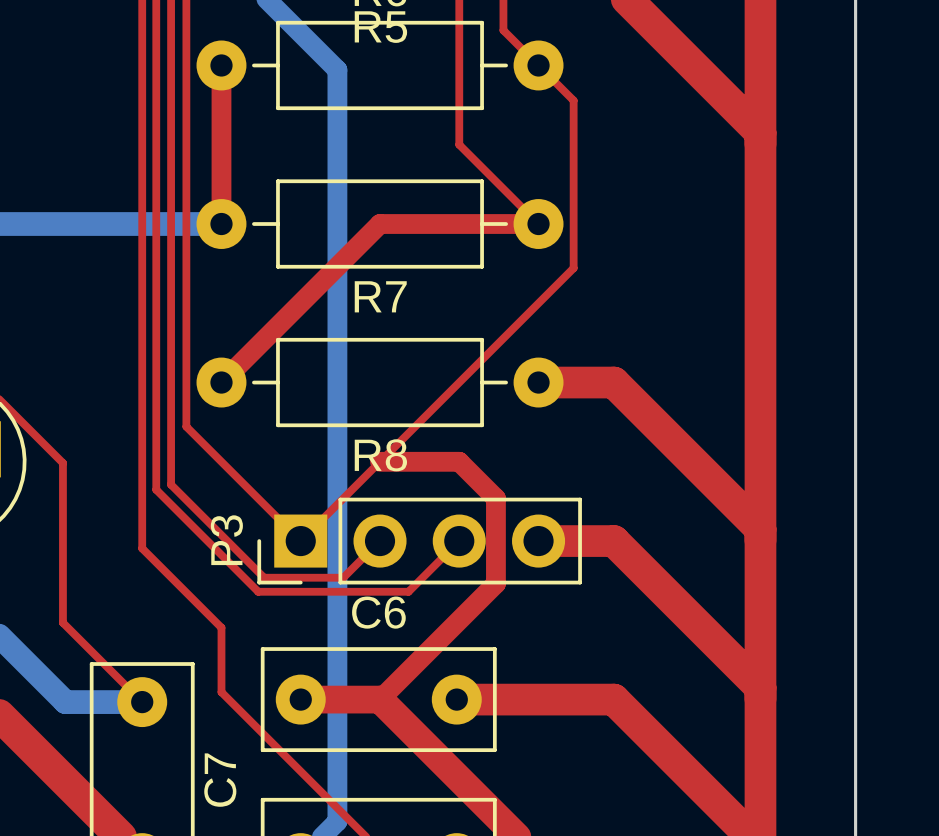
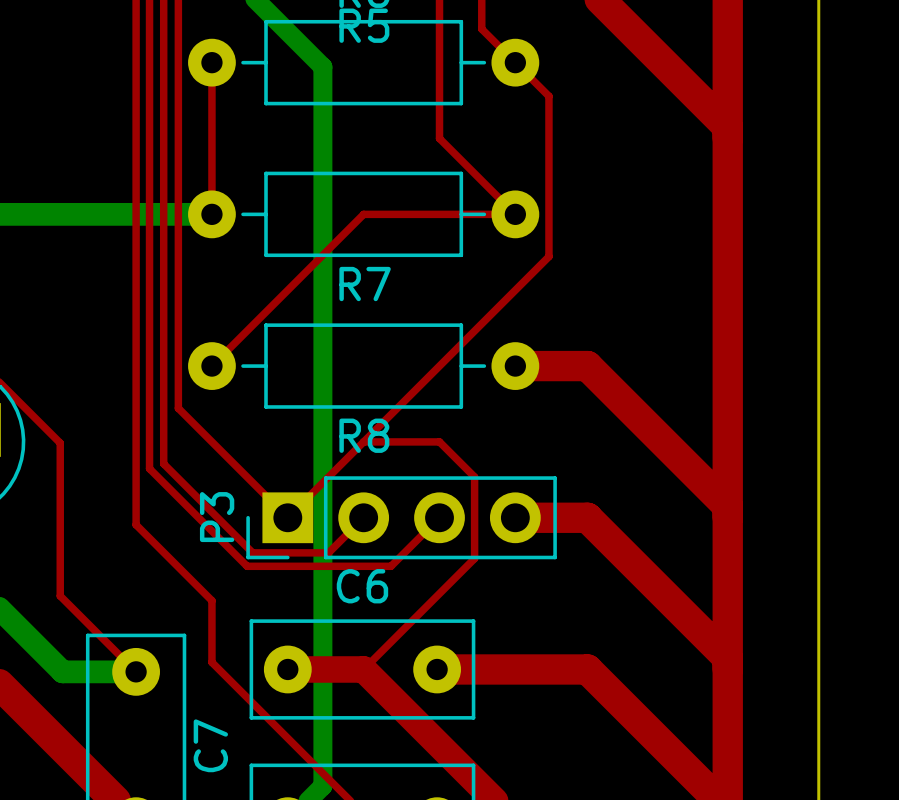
top track width: thick (221, 65) (221, 224) -> thin (211, 62) (211, 214)
top track width: thick (538, 224) (380, 224) (221, 382) -> thin (515, 214) (363, 214) (211, 366)
top track width: thick (380, 461) (459, 461) (495, 498) (495, 583) (380, 699) (300, 699) -> thin (363, 441) (439, 441) (474, 477) (474, 558) (363, 669) (287, 669)

